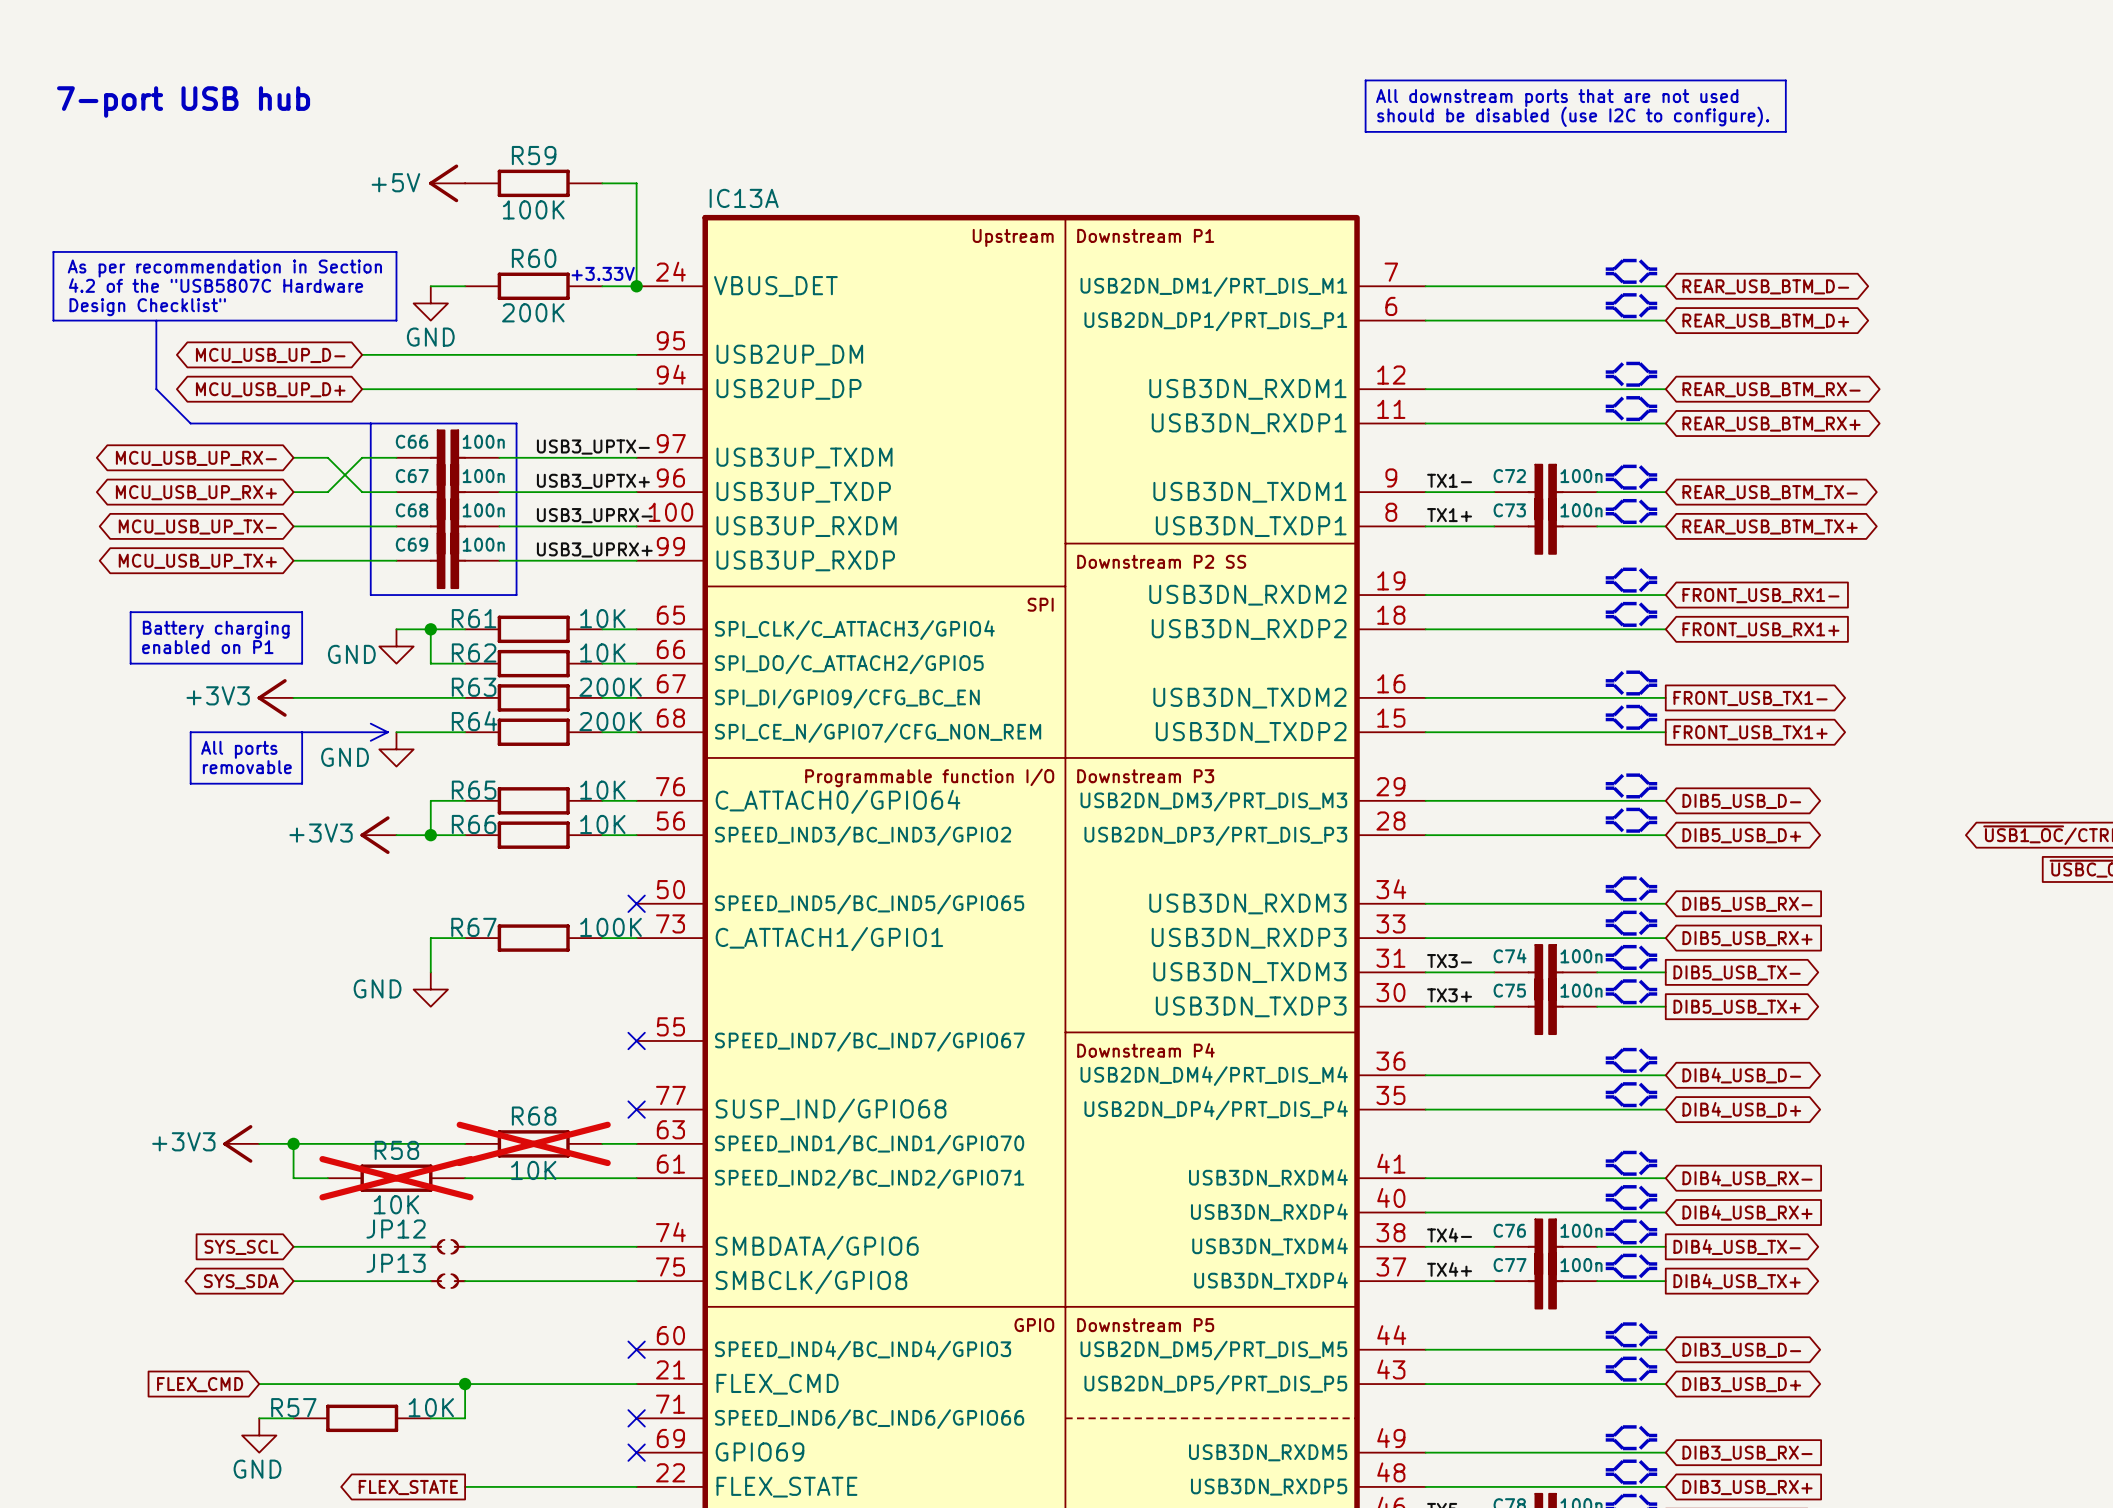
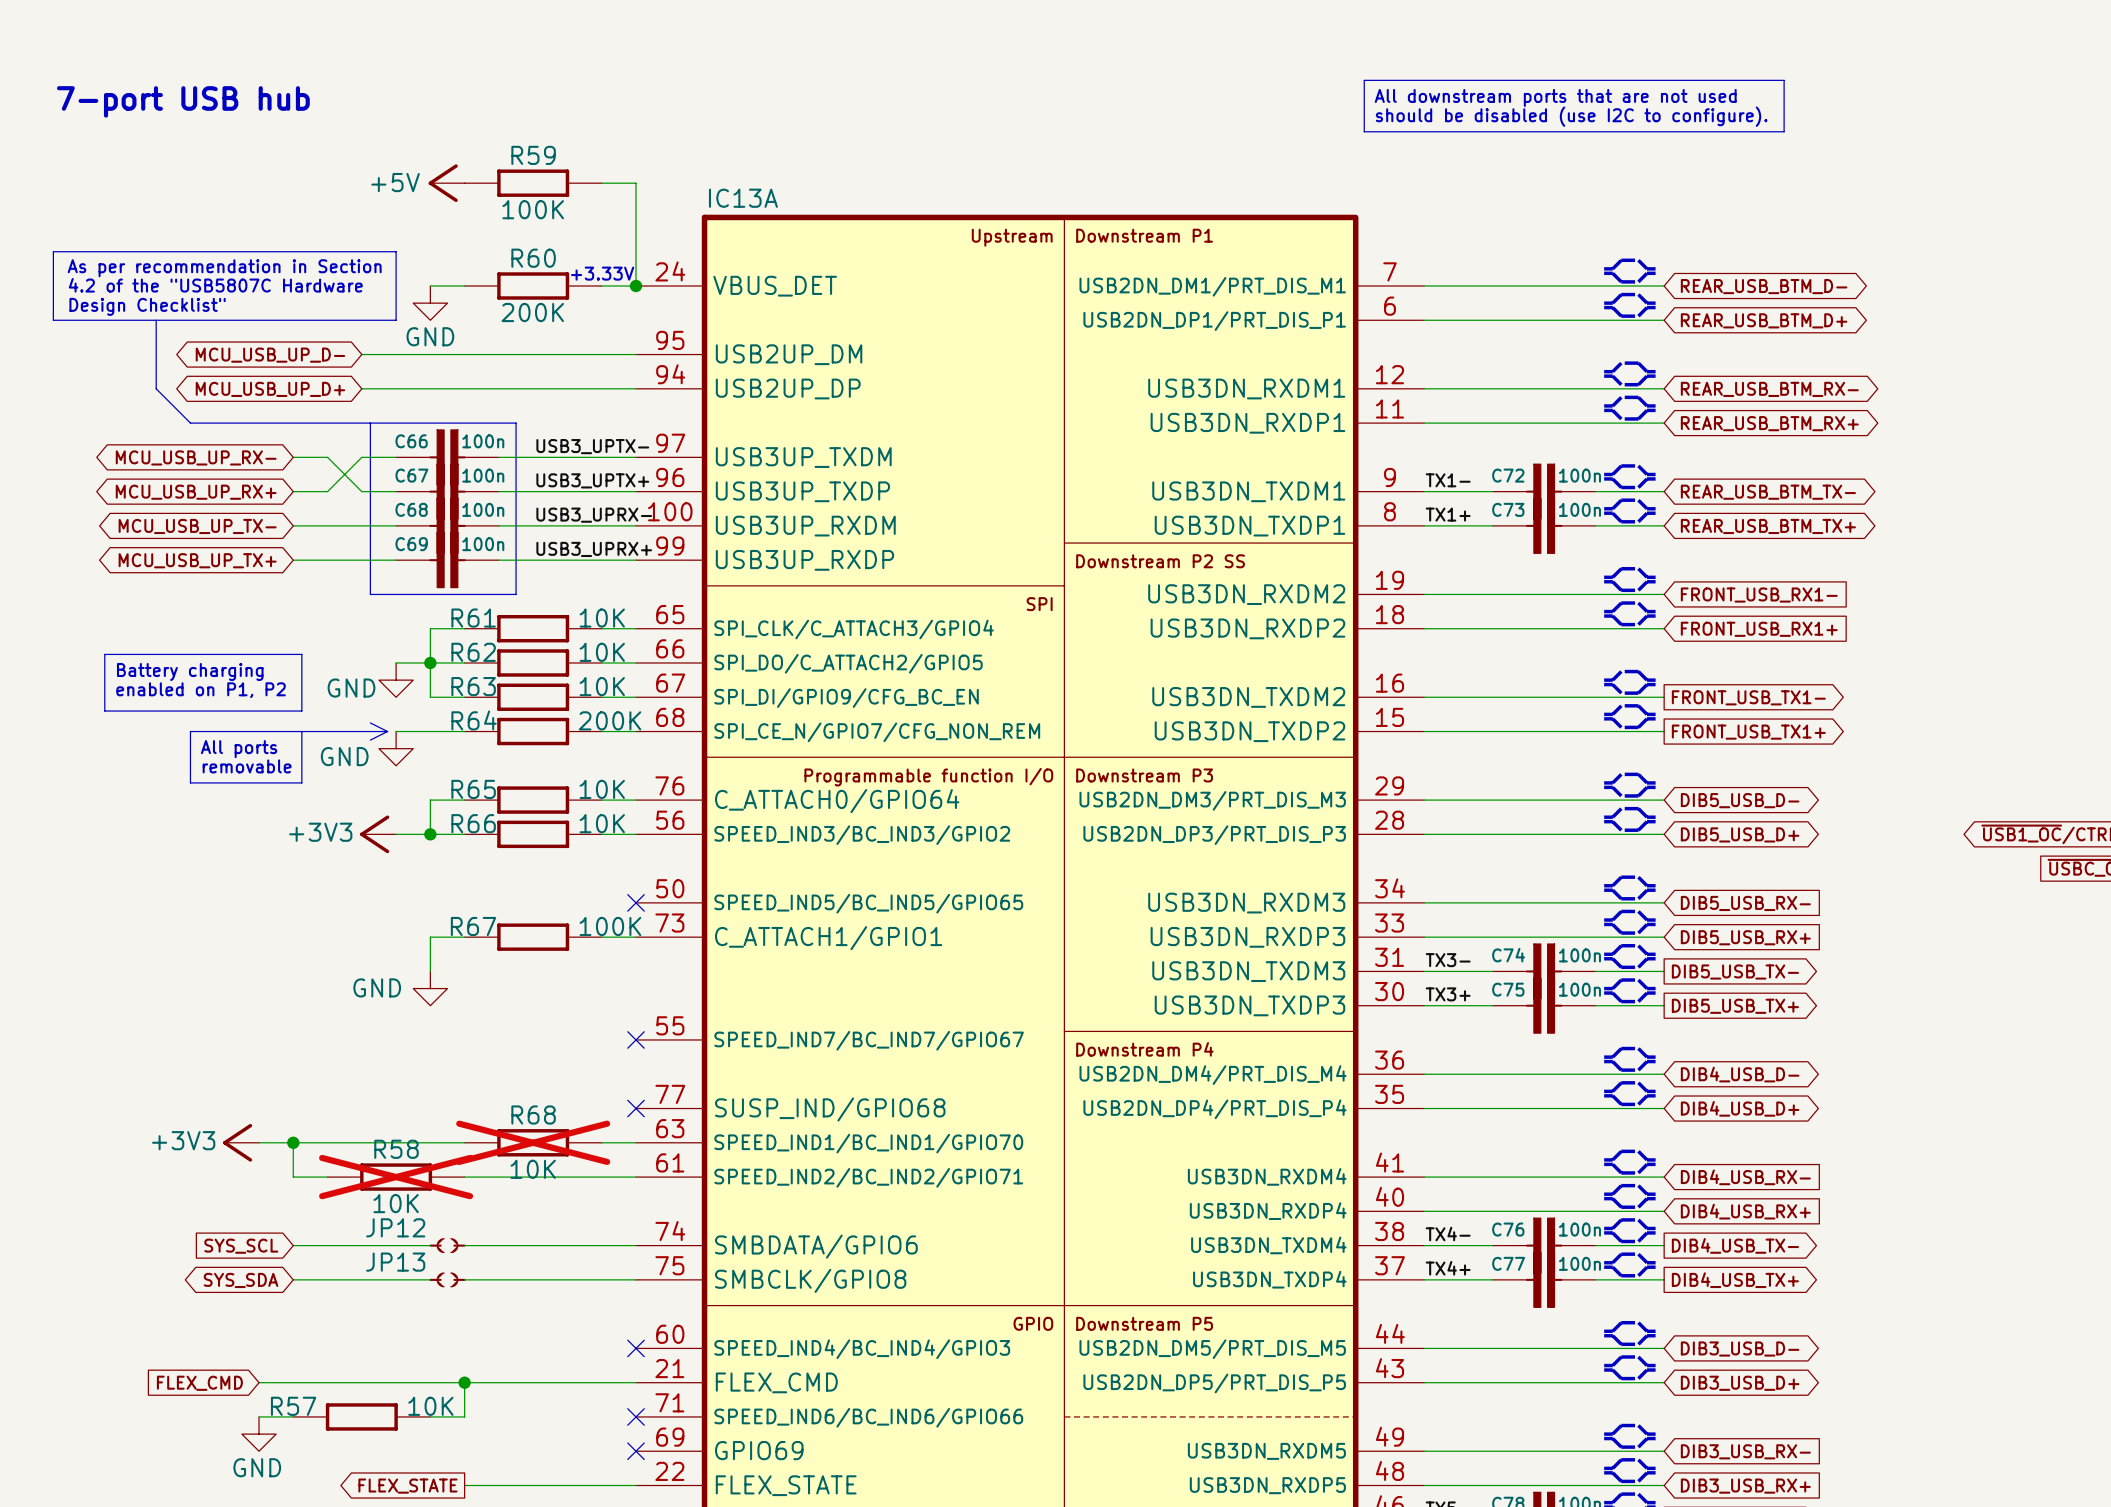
text position: Battery charging (216, 629) -> Battery charging (190, 671)
wire: (396, 629) (430, 629) -> none
junction position: (430, 629) -> (430, 662)
power symbol position: GND (396, 646) -> GND (396, 680)
text: enabled on P1 (207, 647) -> none
line: (302, 655) (302, 612) (130, 612) (130, 663) (302, 663) -> (301, 654) (104, 654) (104, 711) (301, 711) (301, 662)
R63 value: 200K (610, 687) -> 10K (602, 686)
text: none -> enabled on P1, P2 (201, 690)
power symbol: +3V3 (275, 697) -> none
wire: (293, 697) (430, 697) -> (396, 662) (430, 662) (430, 697)

